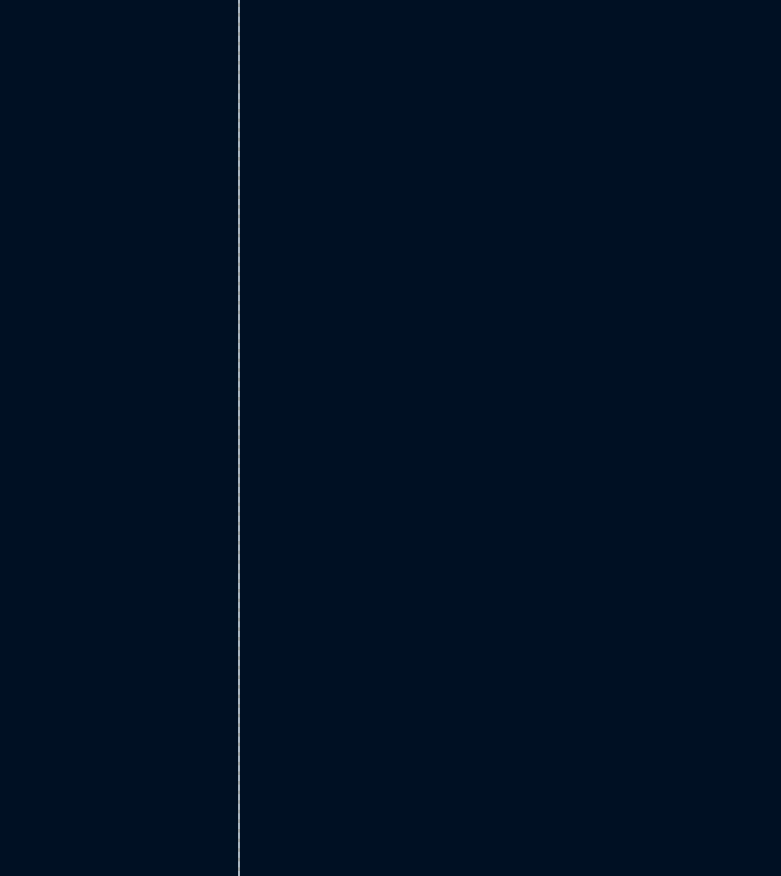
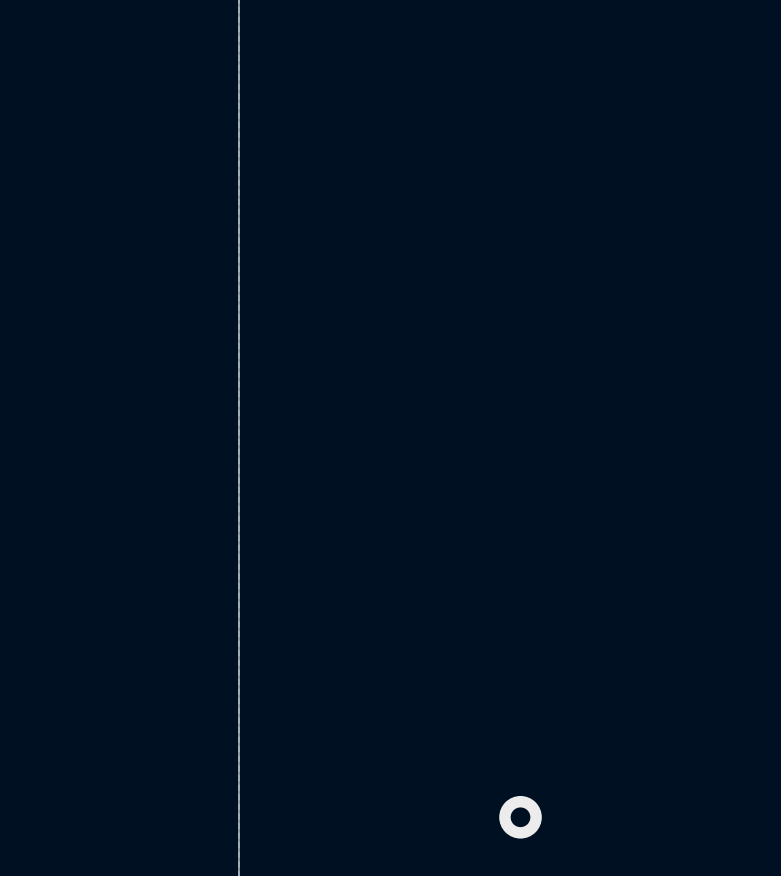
via: none -> (520, 817)

